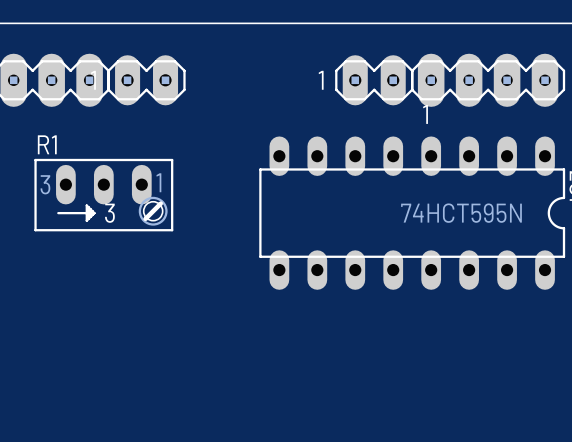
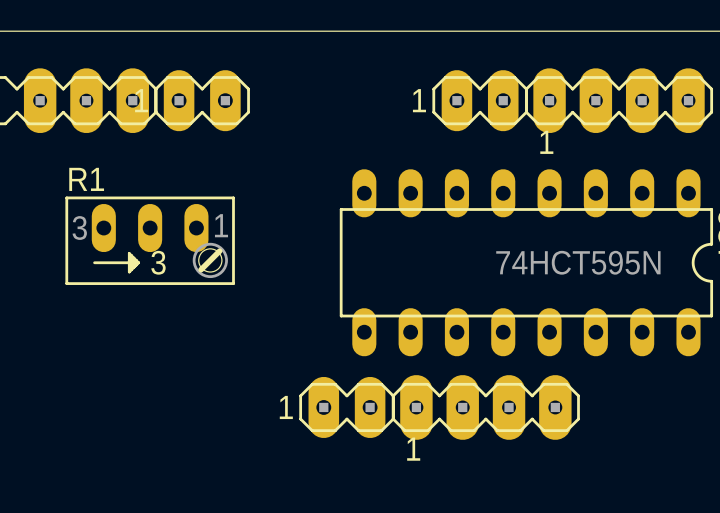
part: none -> (346, 407)
part: none -> (485, 407)

